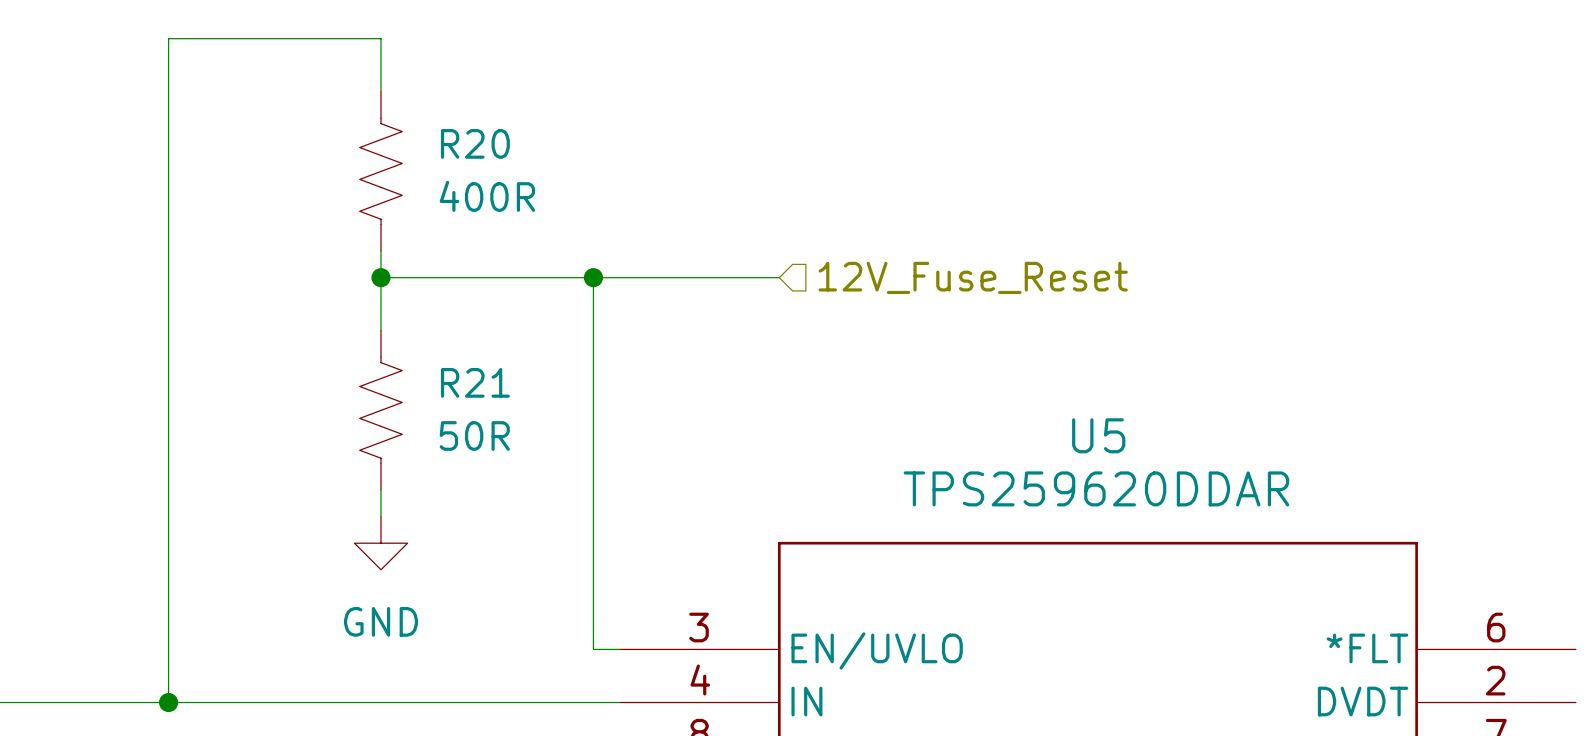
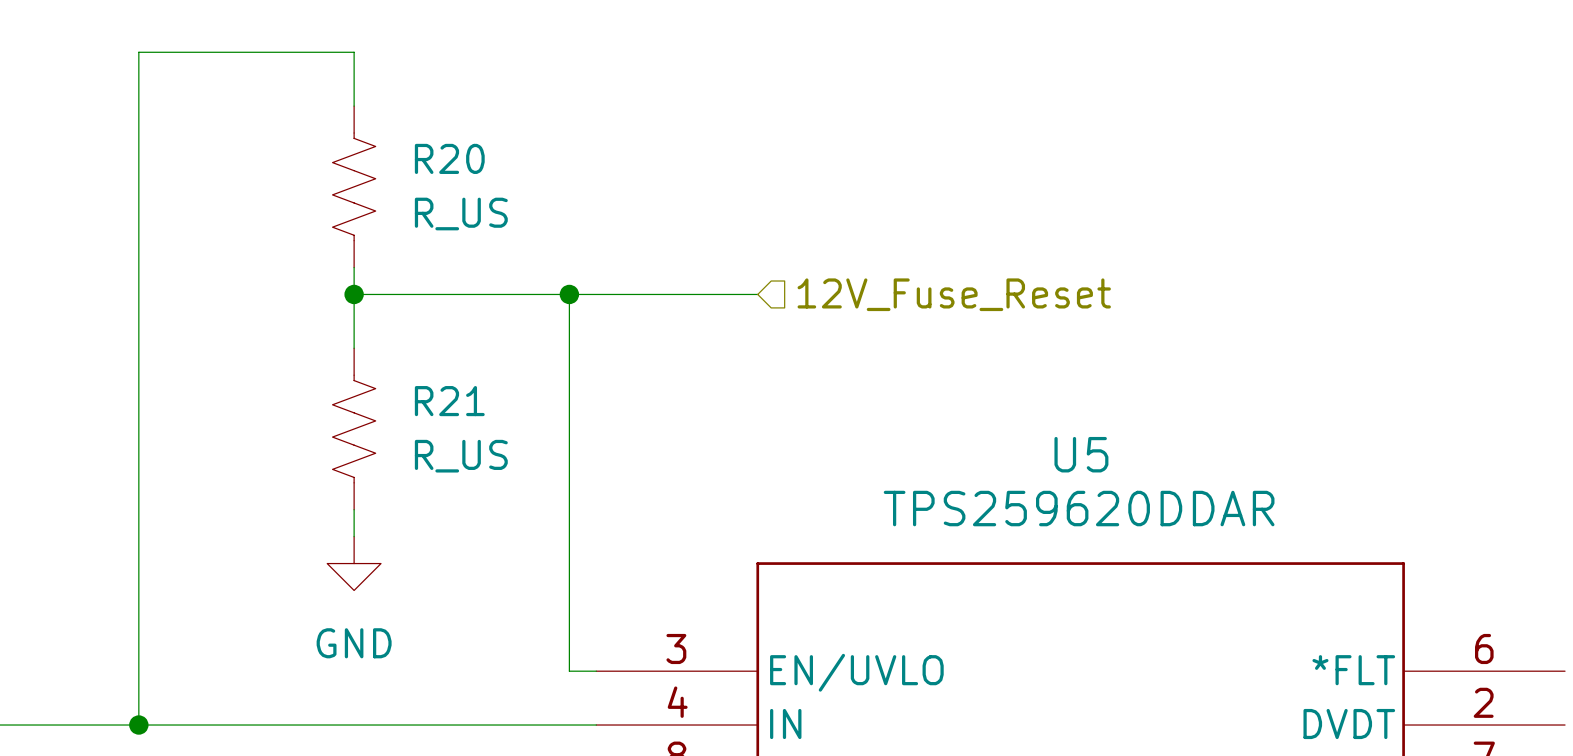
R20 value: 400R (487, 196) -> R_US (461, 214)
R21 value: 50R (474, 435) -> R_US (461, 456)

